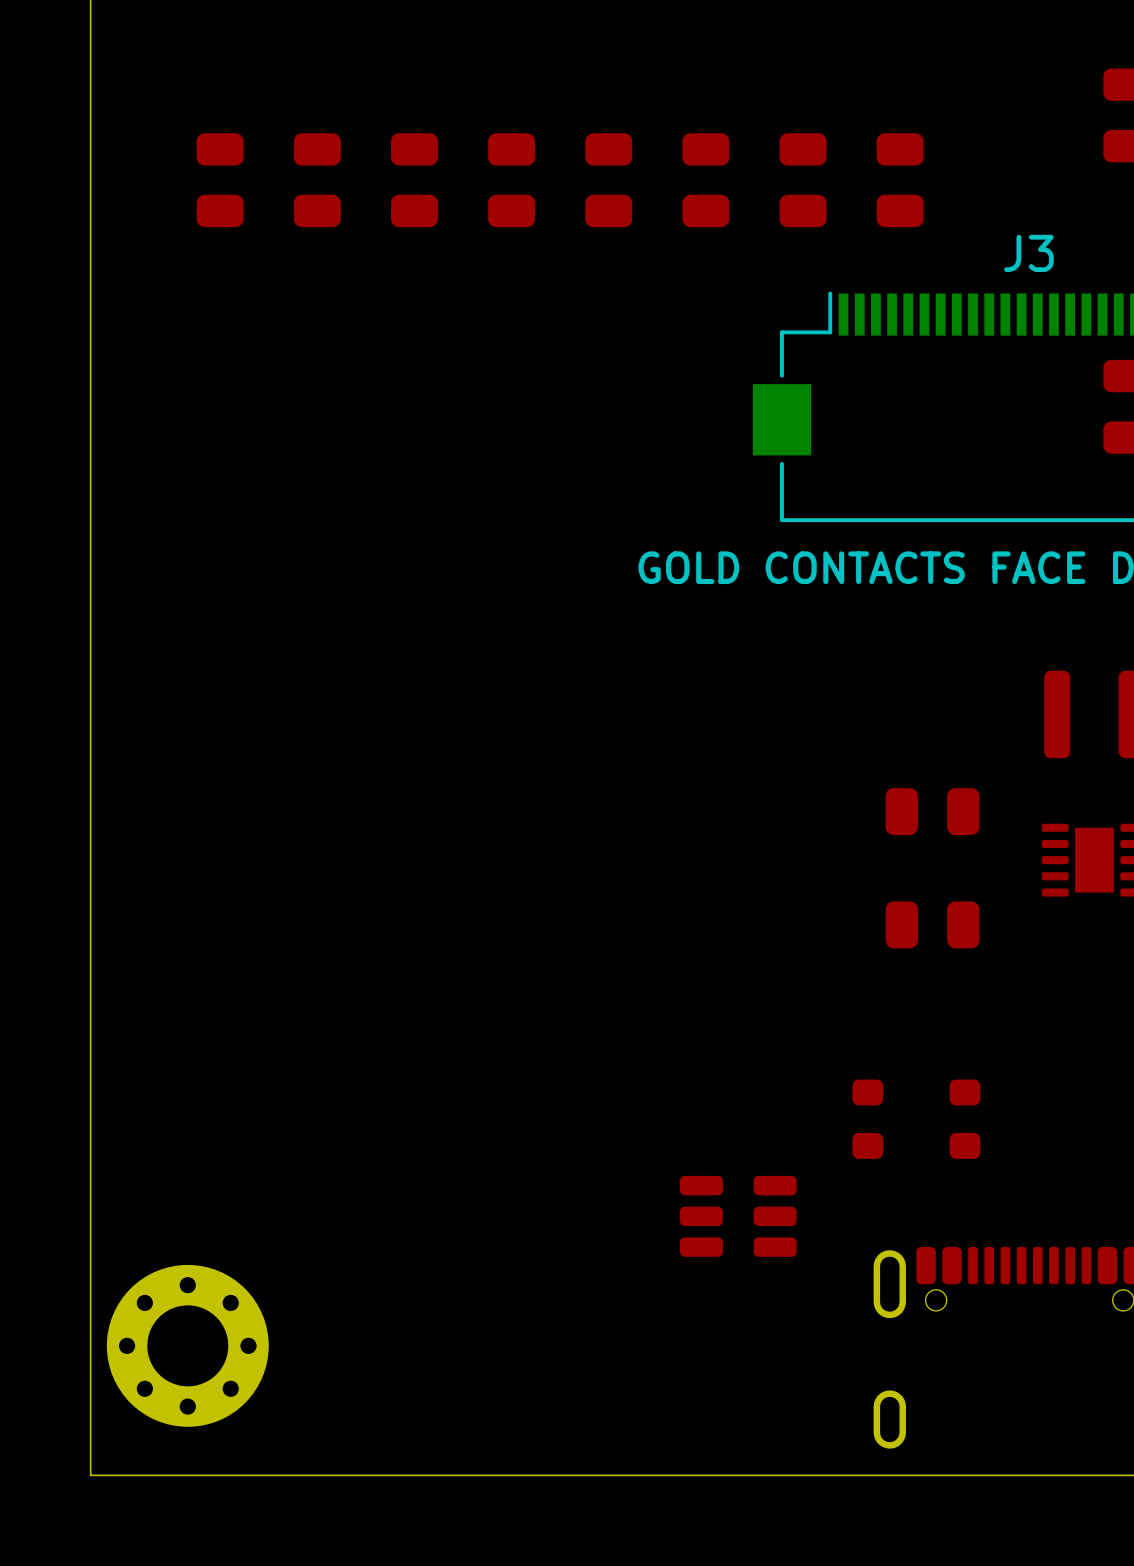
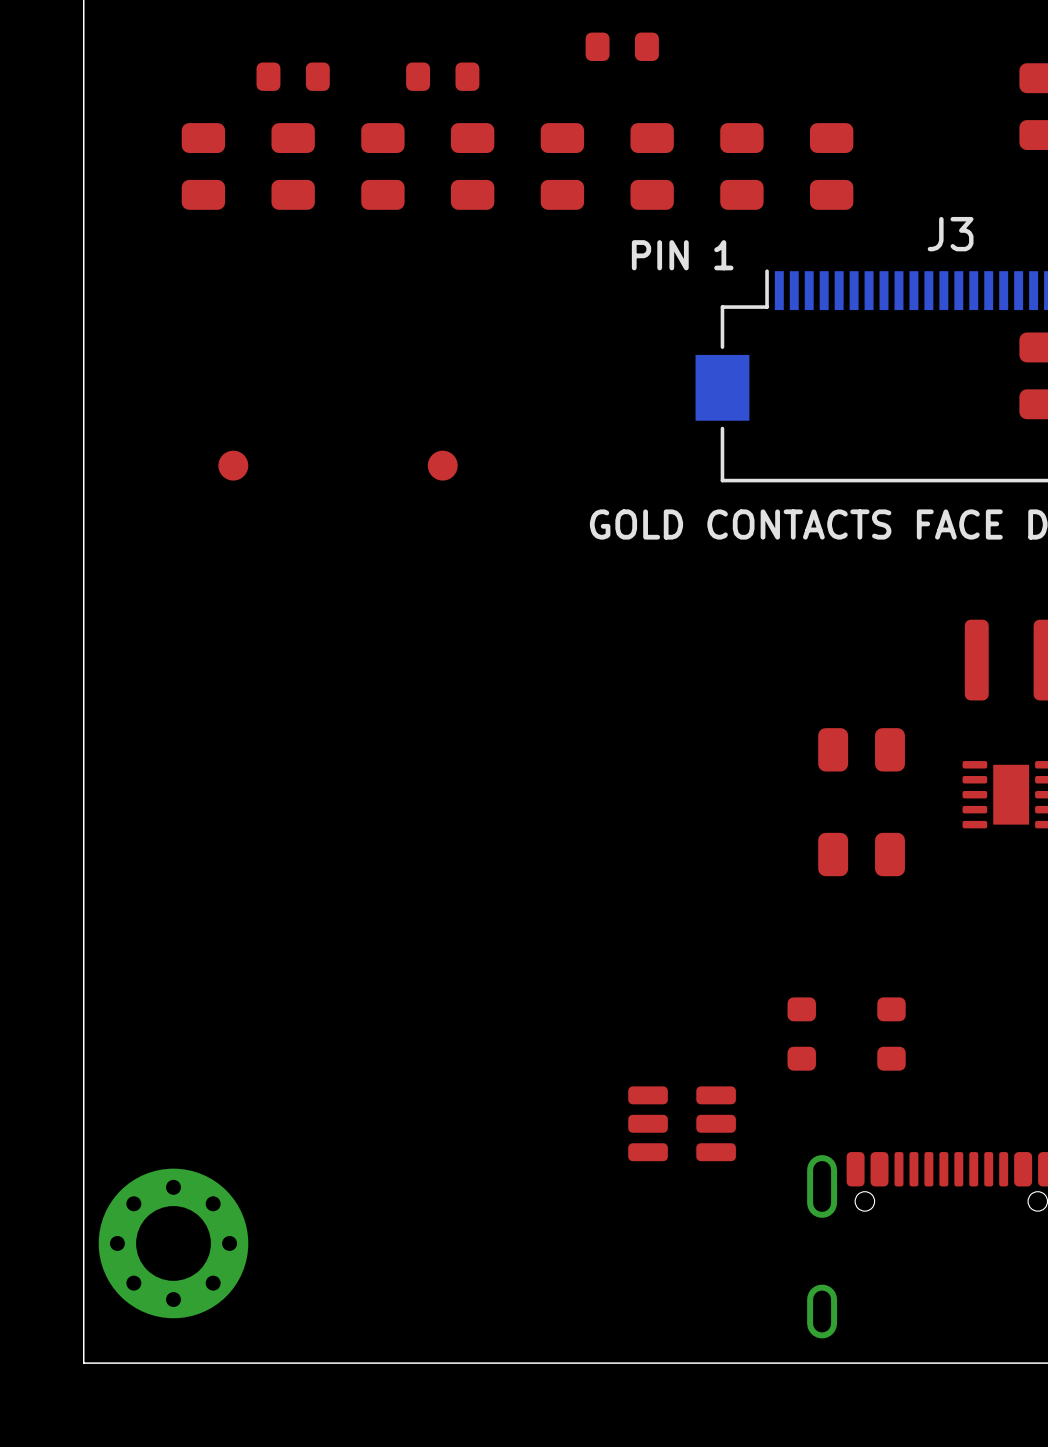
part: none -> (622, 46)
part: none -> (293, 76)
part: none -> (442, 76)
text: none -> PIN 1 (682, 255)
part: none -> (233, 465)
part: none -> (442, 465)

